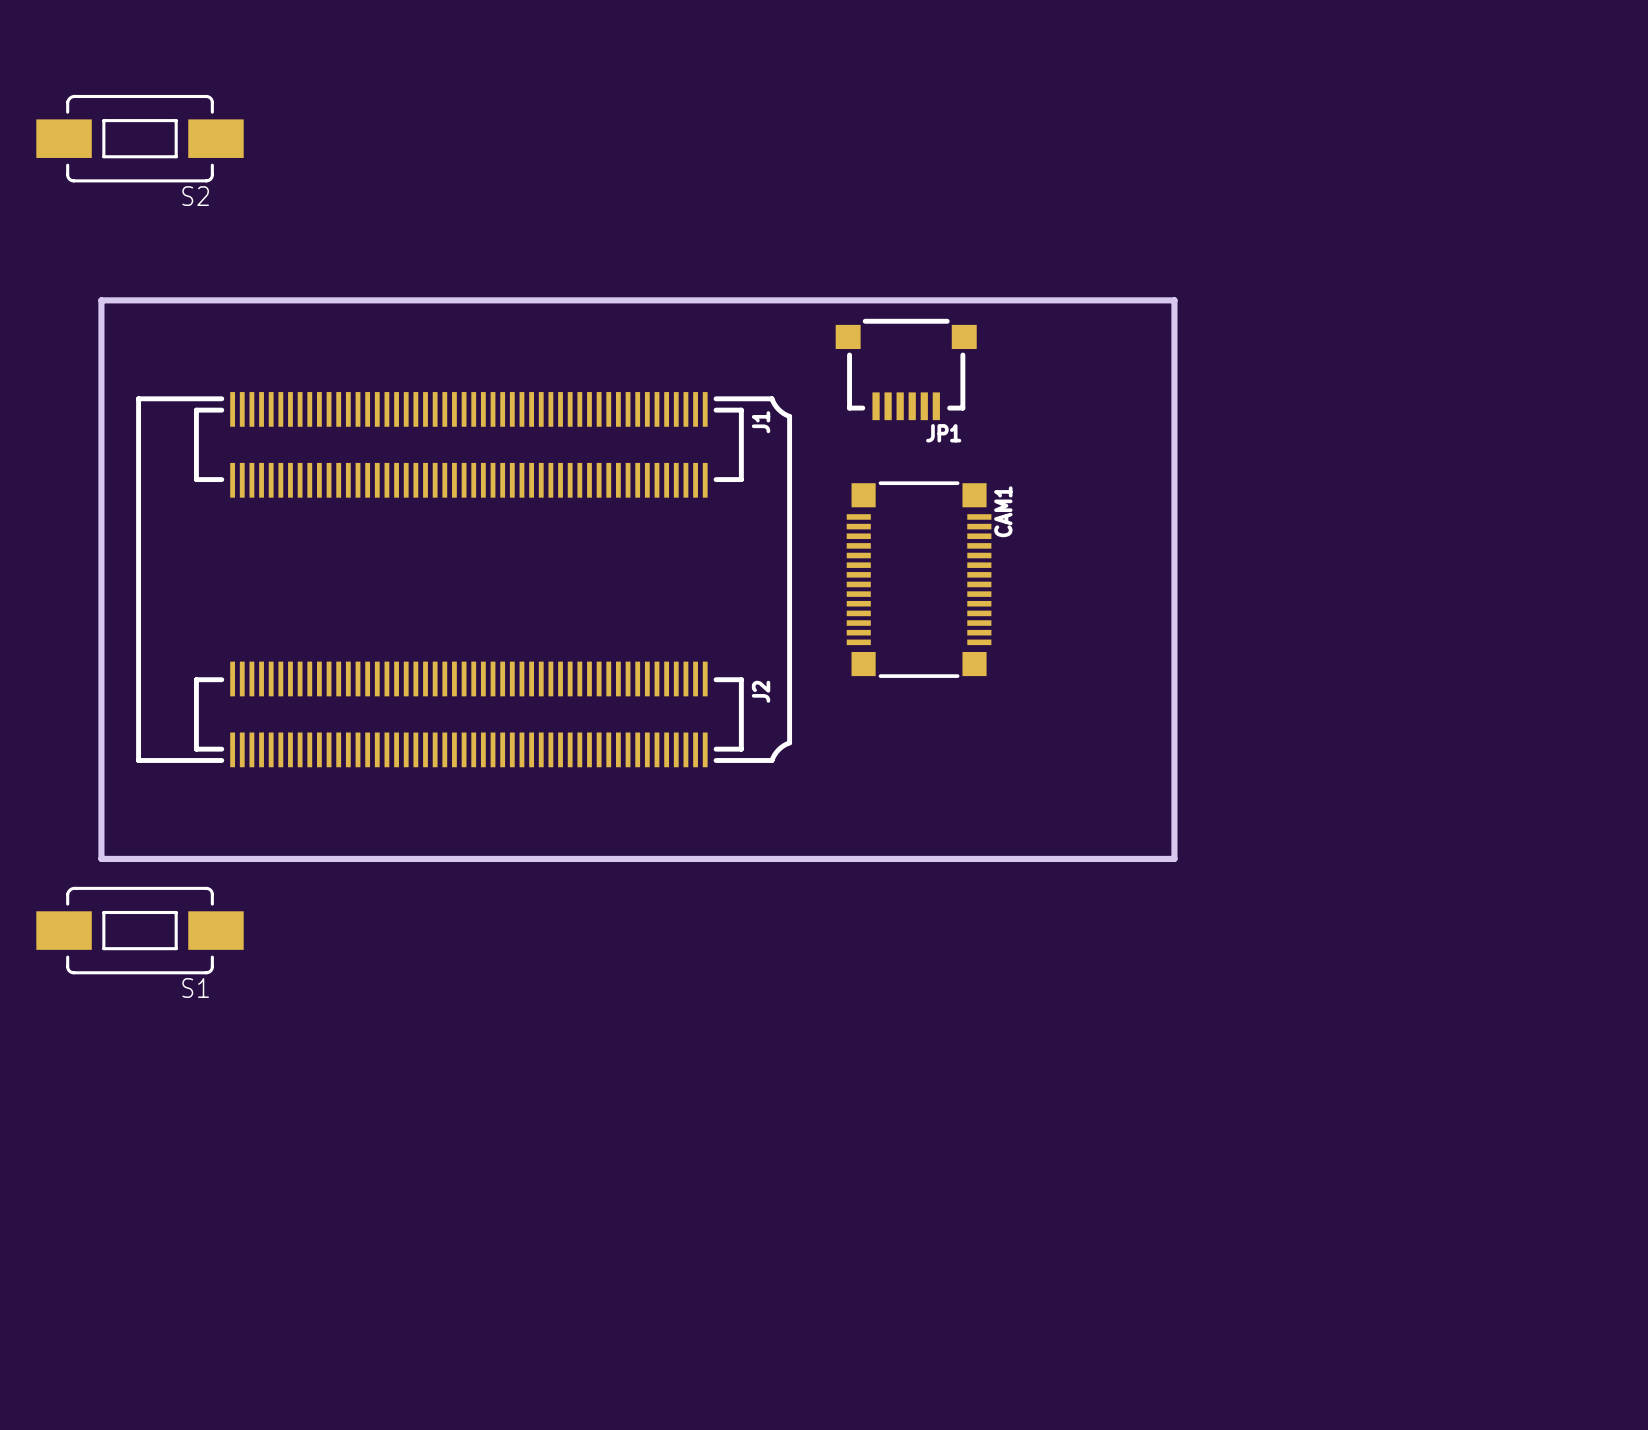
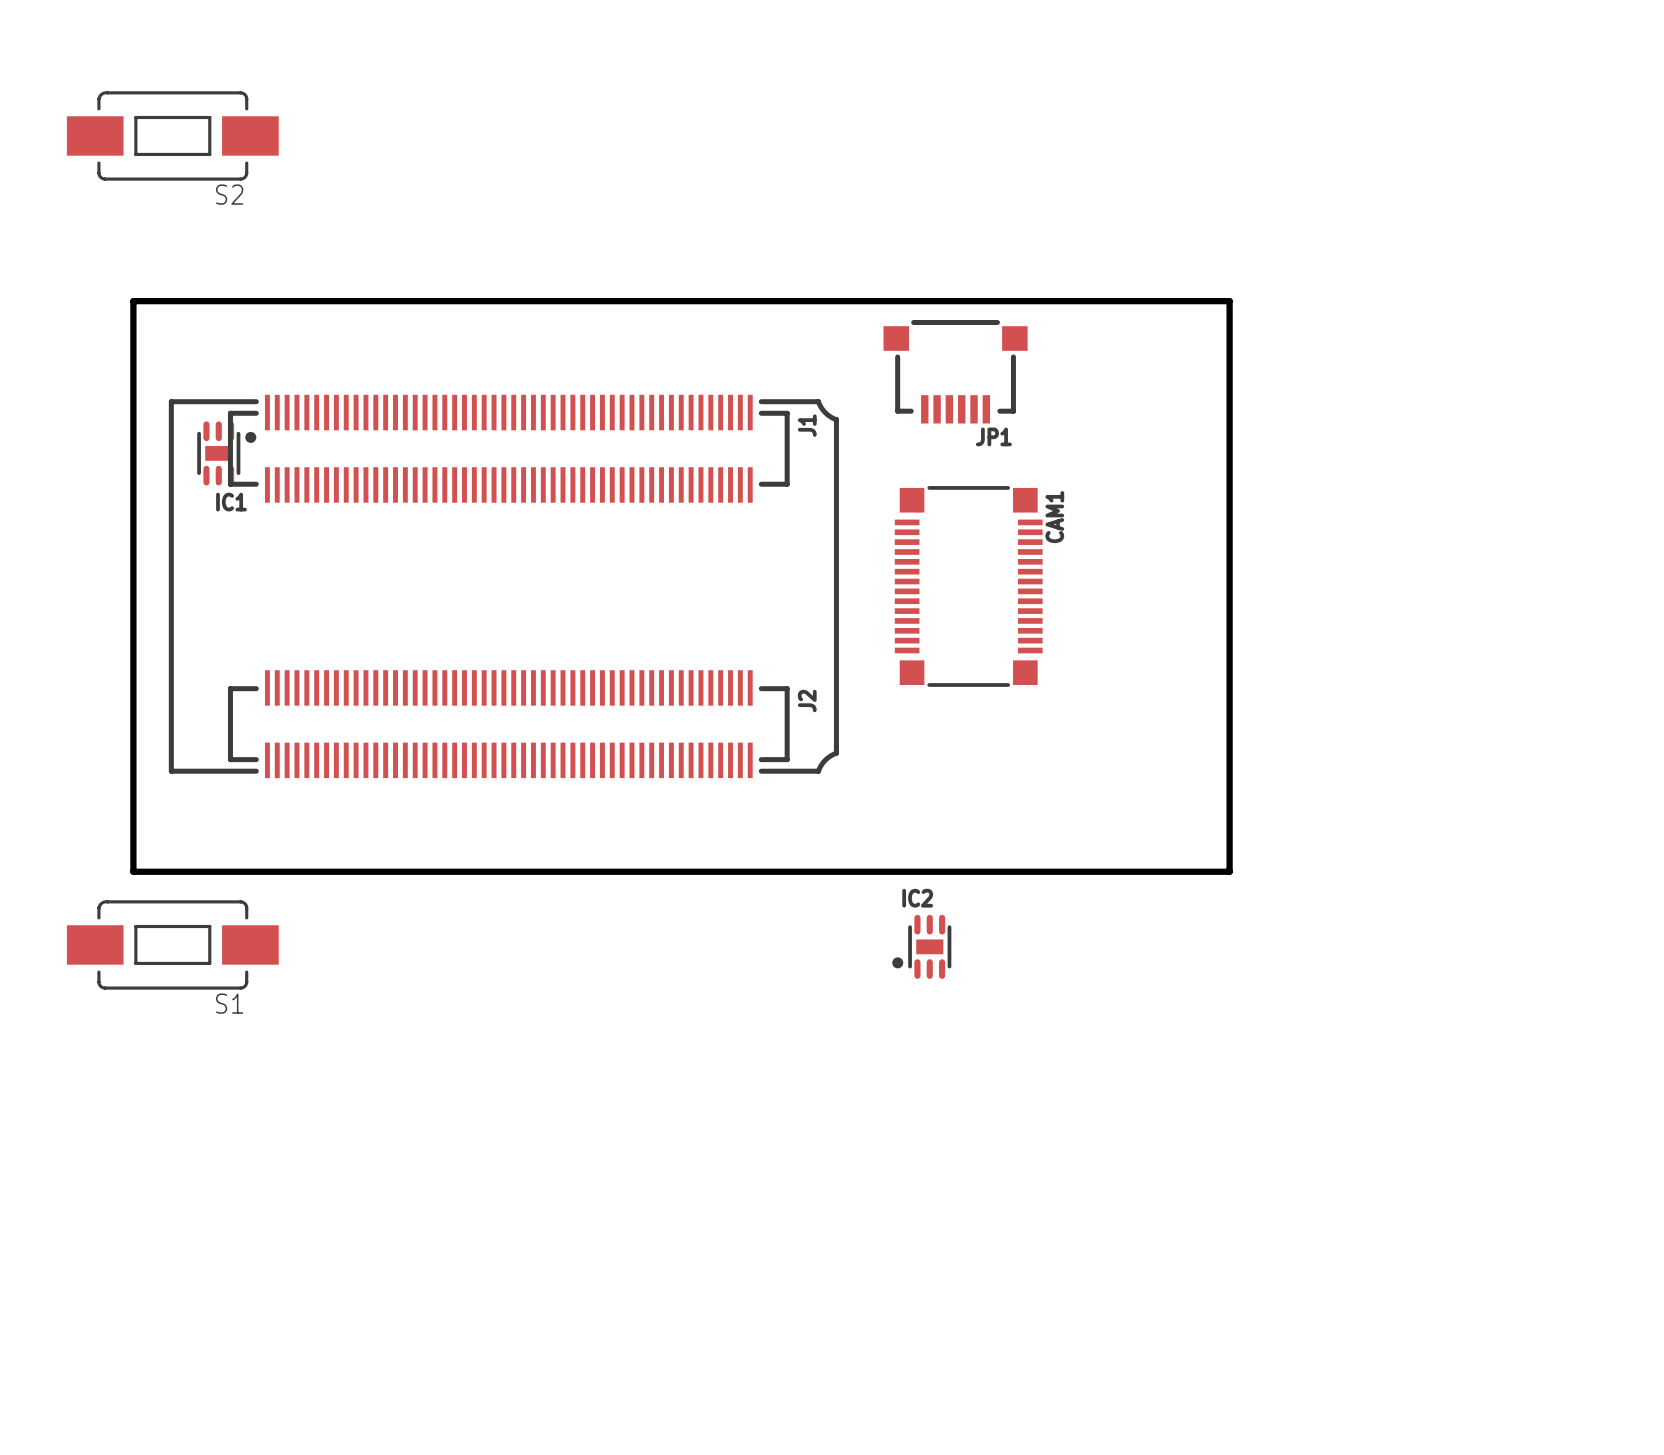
IC1: none -> (226, 453)
IC2: none -> (921, 946)

